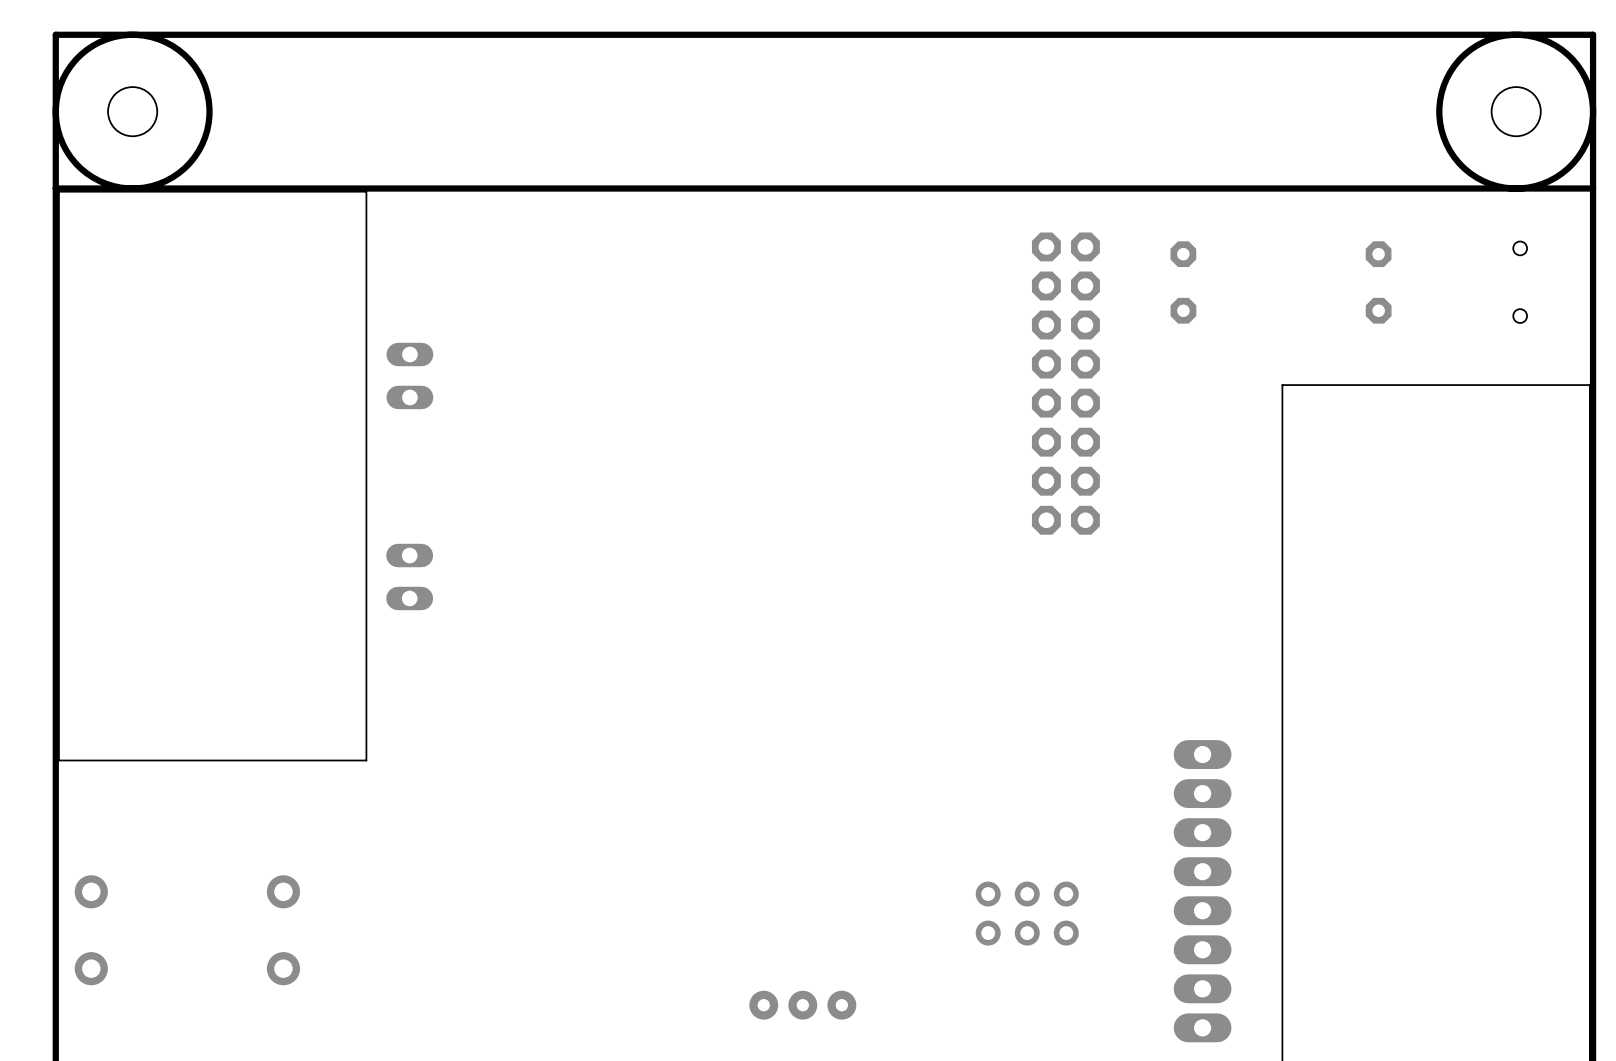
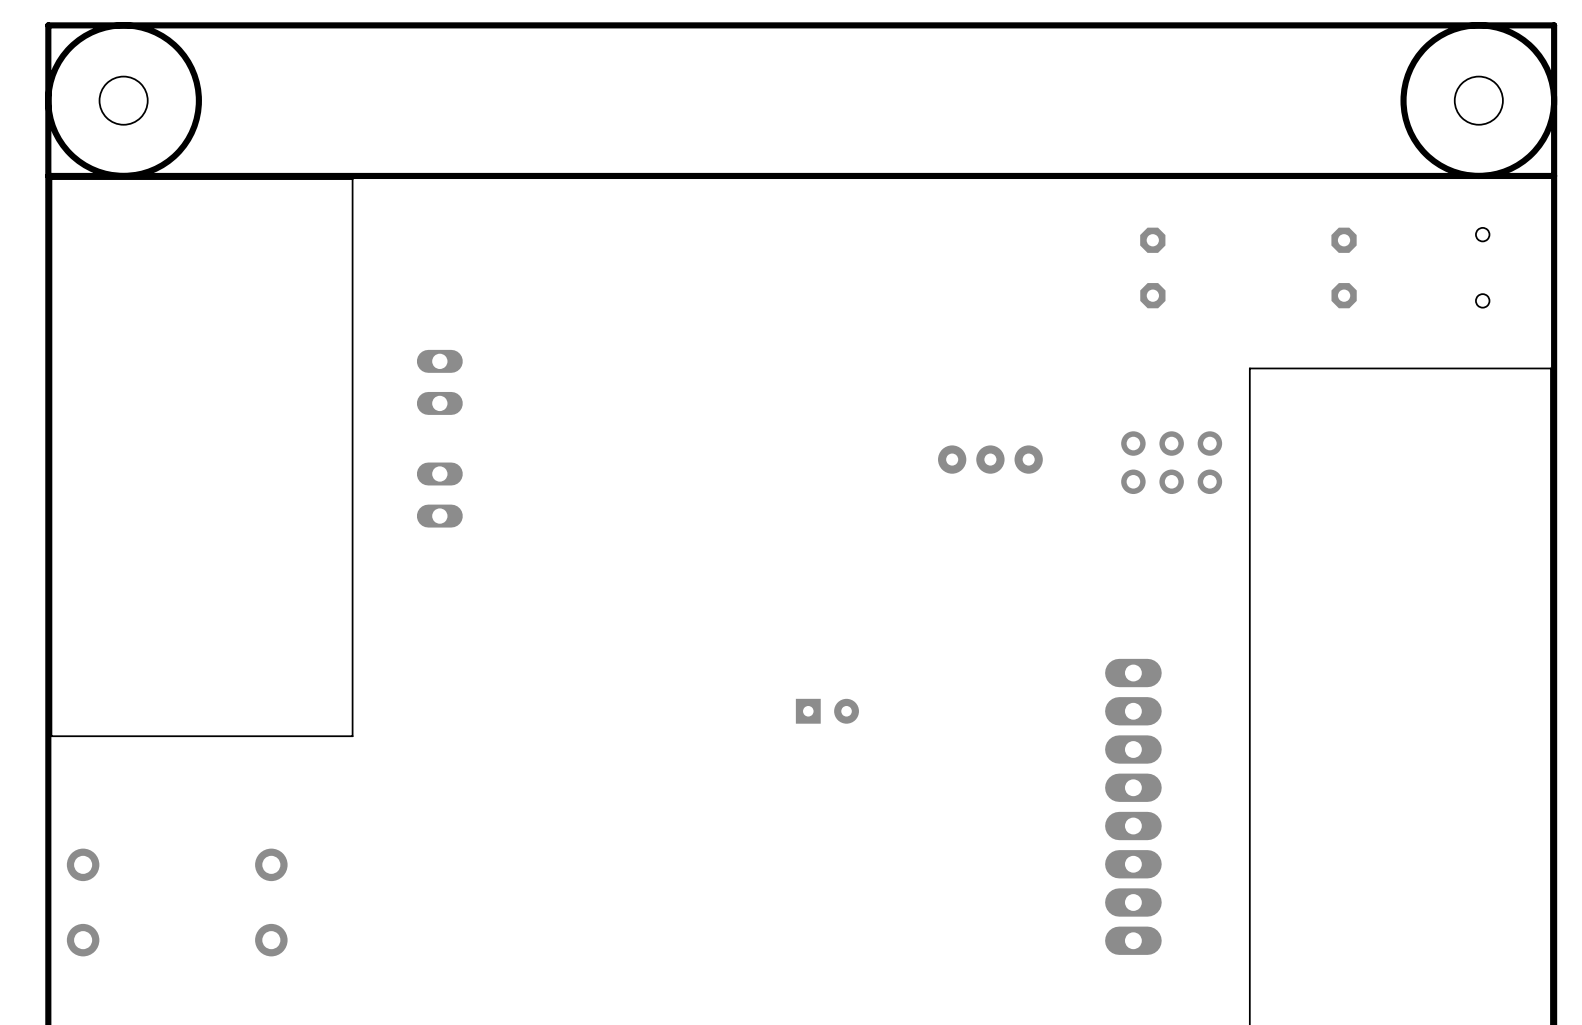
part position: (409, 375) -> (439, 382)
part: (1065, 383) -> none
part: none -> (990, 459)
part: none -> (1171, 462)
part: none -> (439, 495)
part: (409, 577) -> none
part: none -> (827, 711)
part position: (1202, 891) -> (1133, 806)
part: (1027, 913) -> none
part: (802, 1005) -> none

